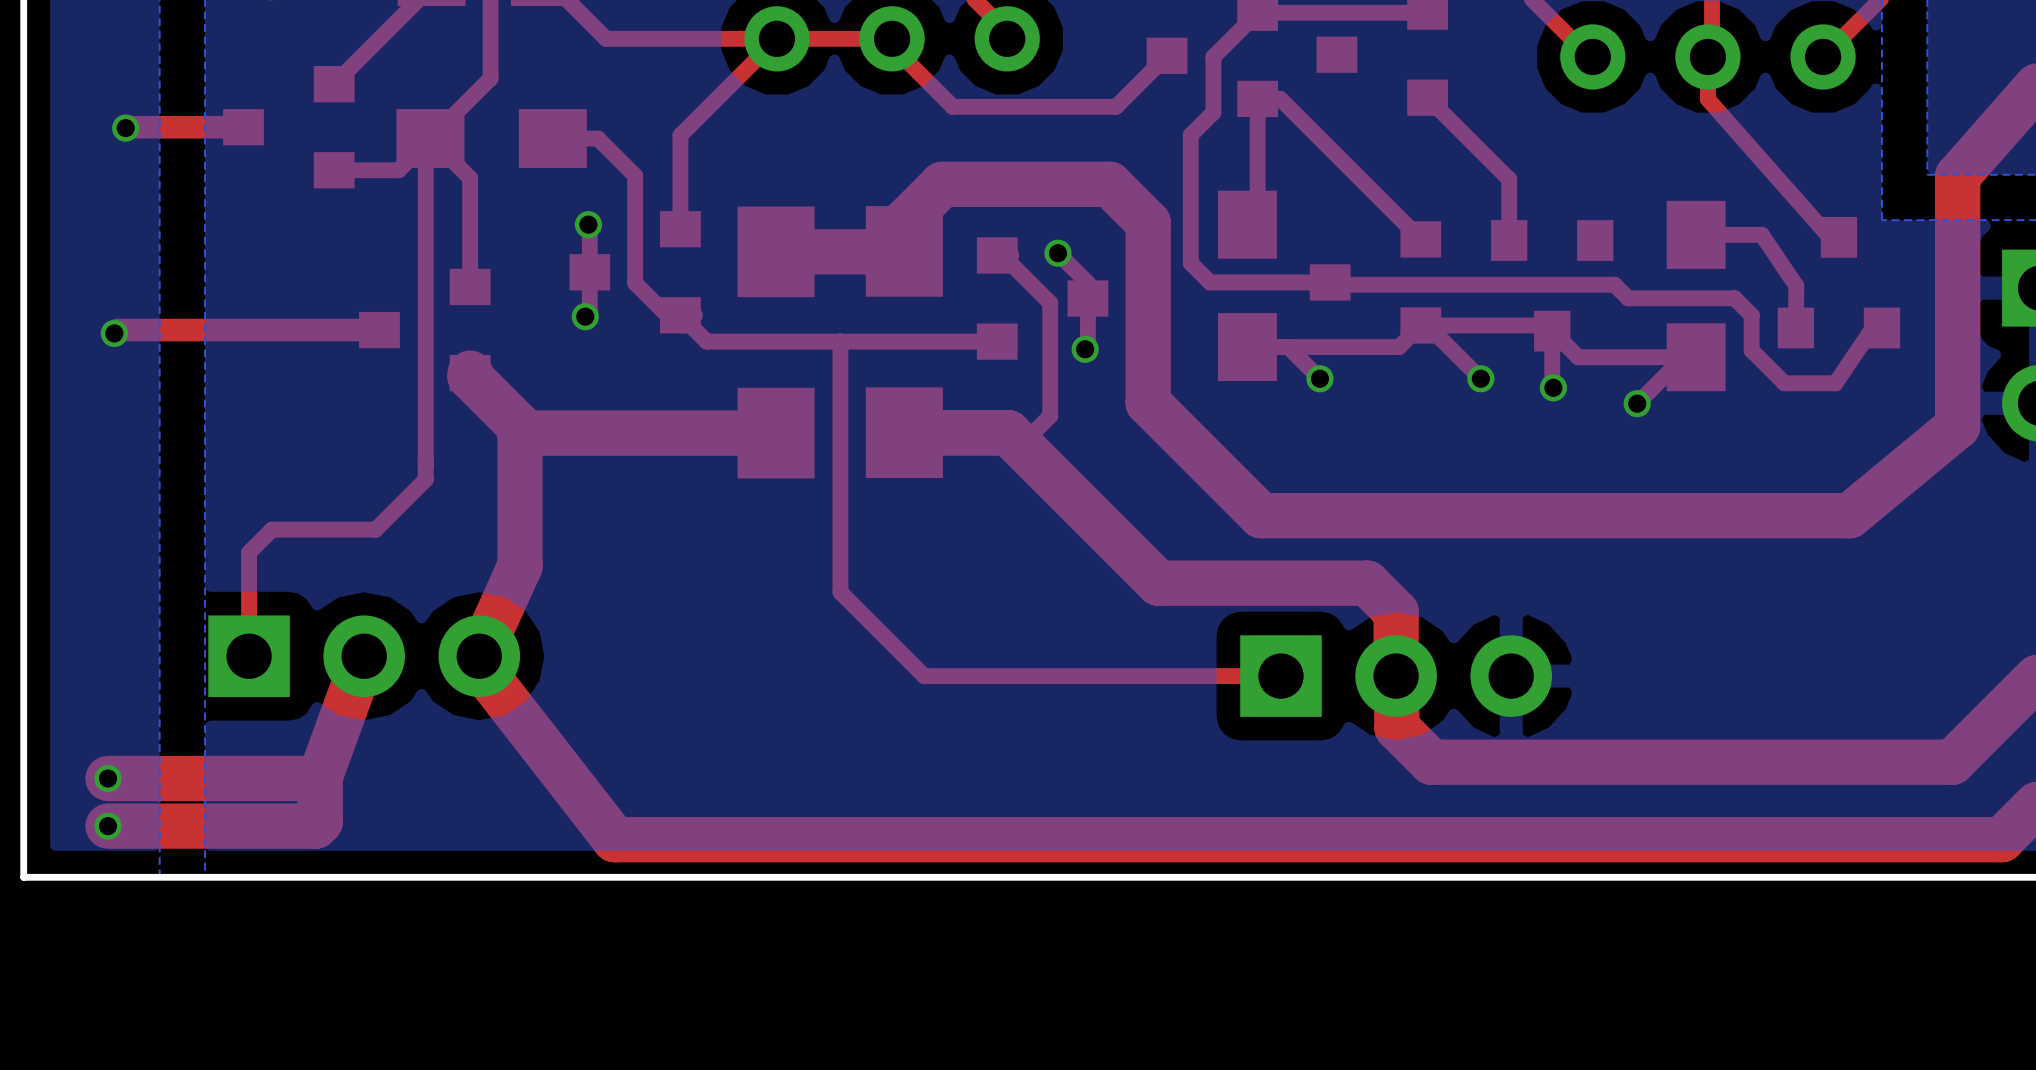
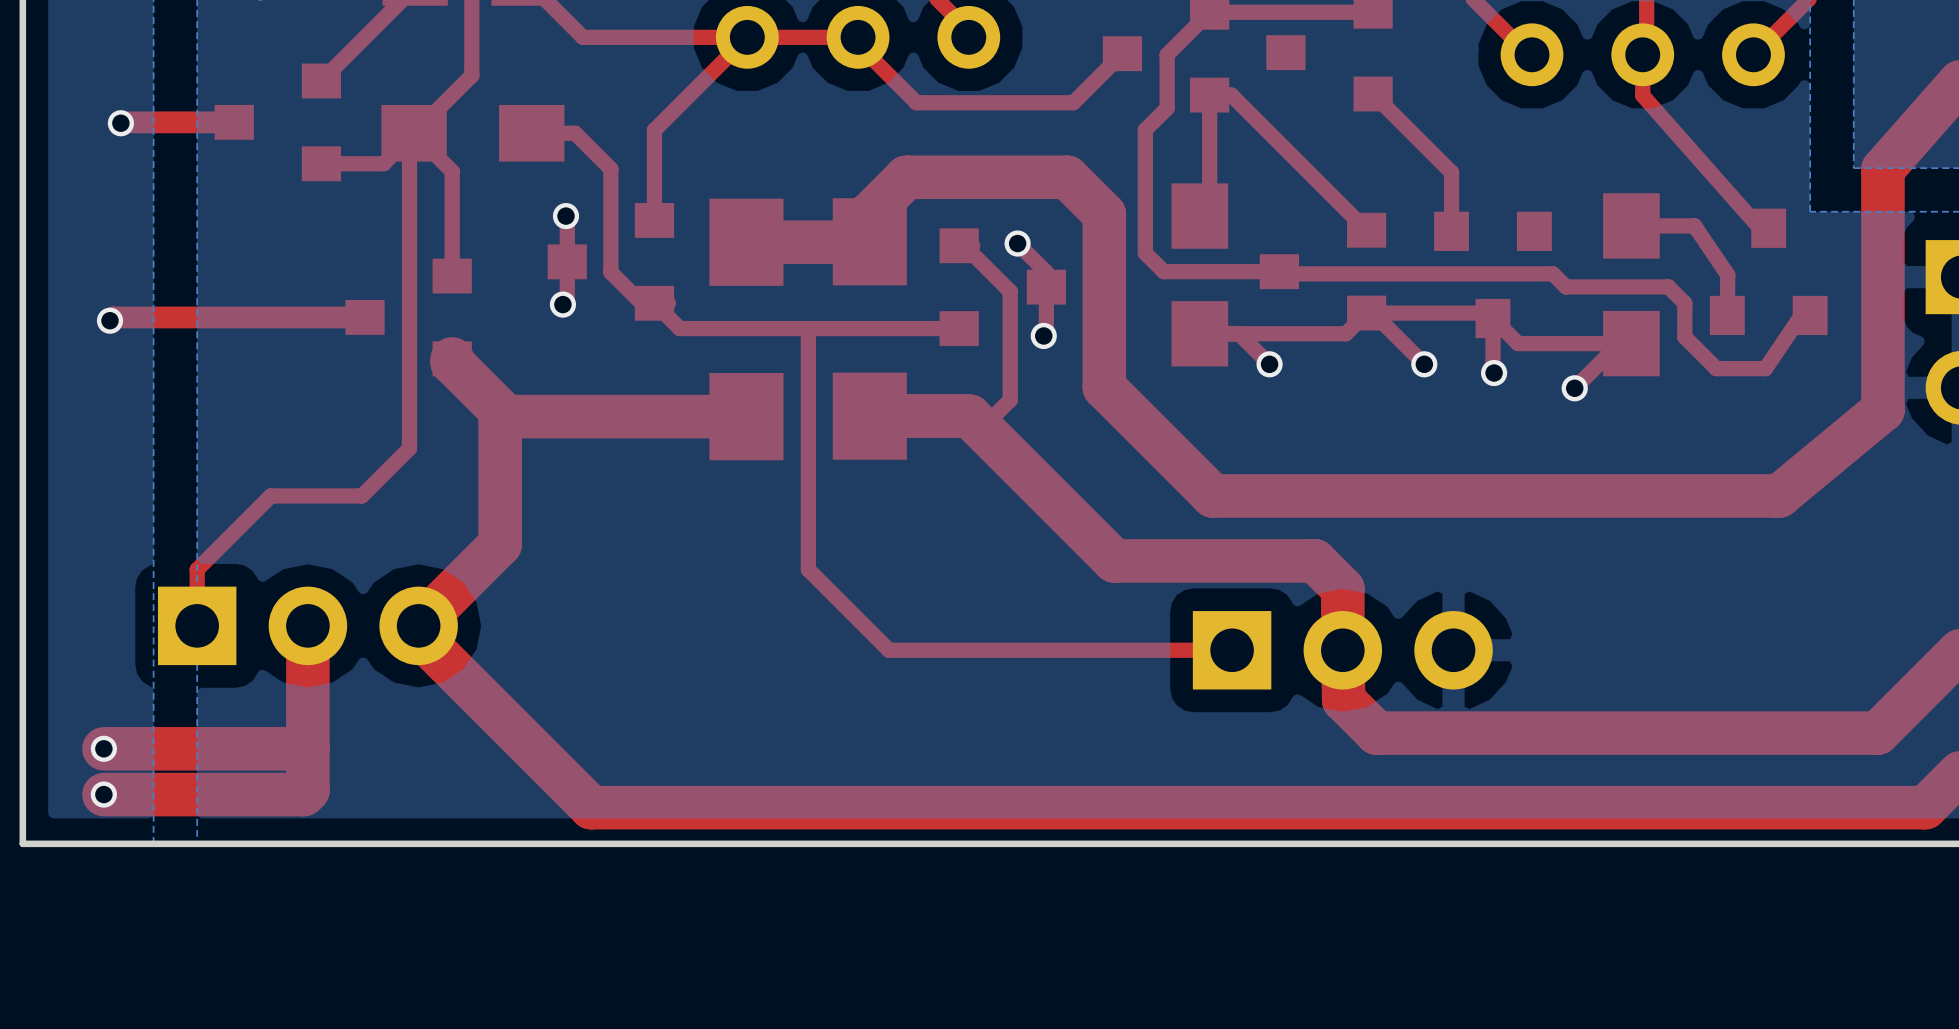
top track: (425, 466) (425, 479) (375, 529) (272, 529) (249, 552) (249, 656) -> (409, 448) (361, 495) (270, 495) (197, 569) (197, 625)
top track: (520, 565) (479, 656) (479, 665) (614, 839) -> (500, 544) (418, 625) (418, 635) (591, 807)
top track: (364, 656) (320, 777) -> (307, 625) (307, 747)
part position: (364, 656) -> (307, 625)

